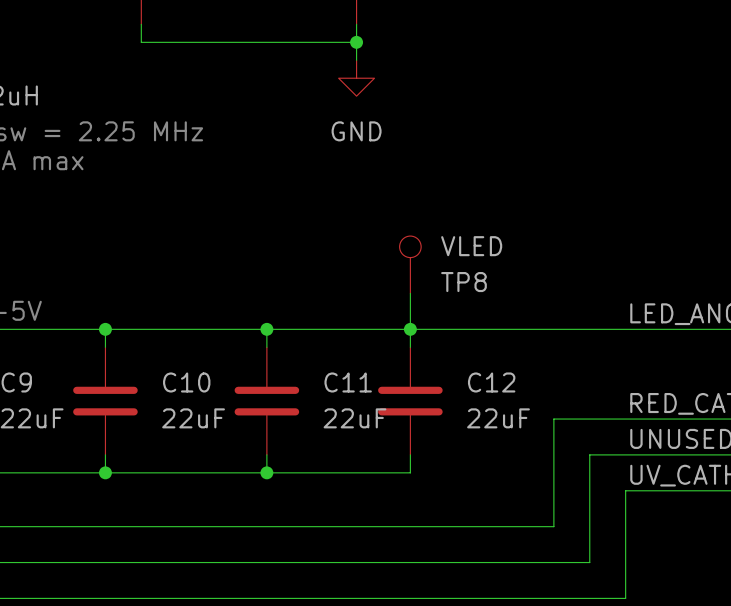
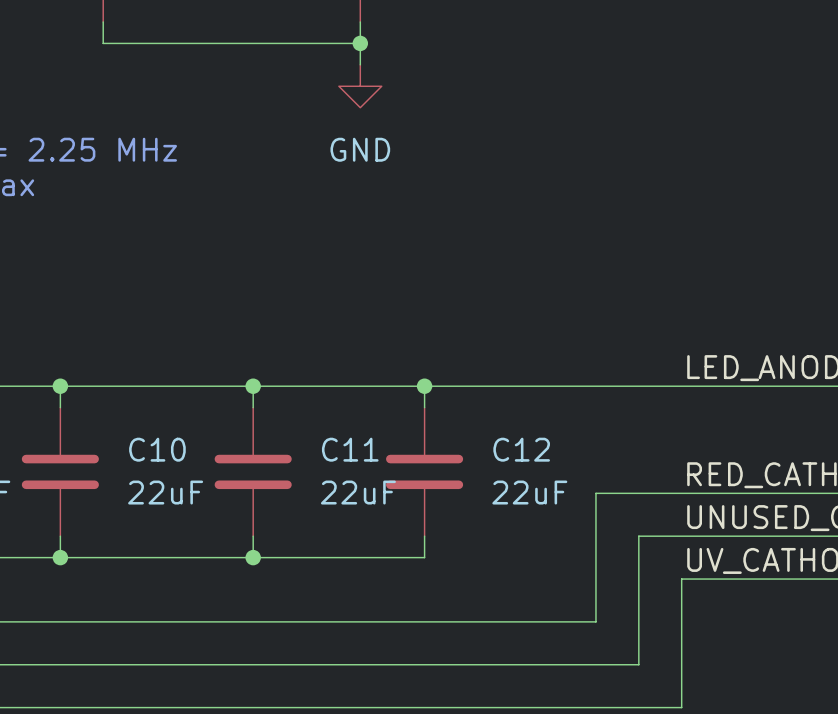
TP8: VLED (410, 264) -> none
wire: (410, 293) (410, 329) -> none

